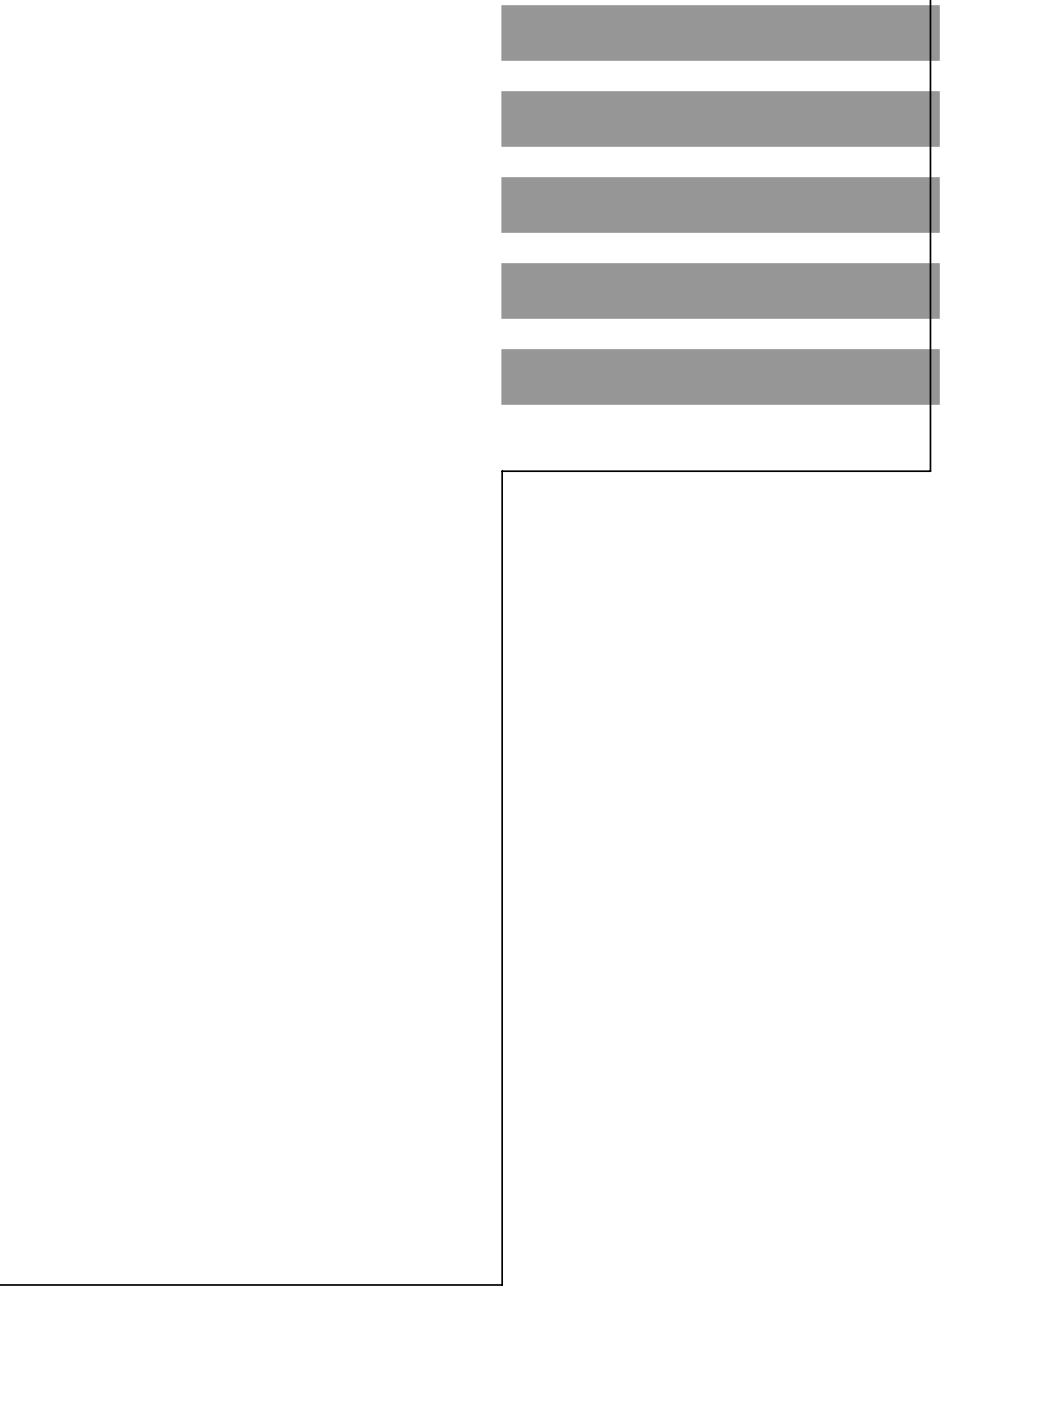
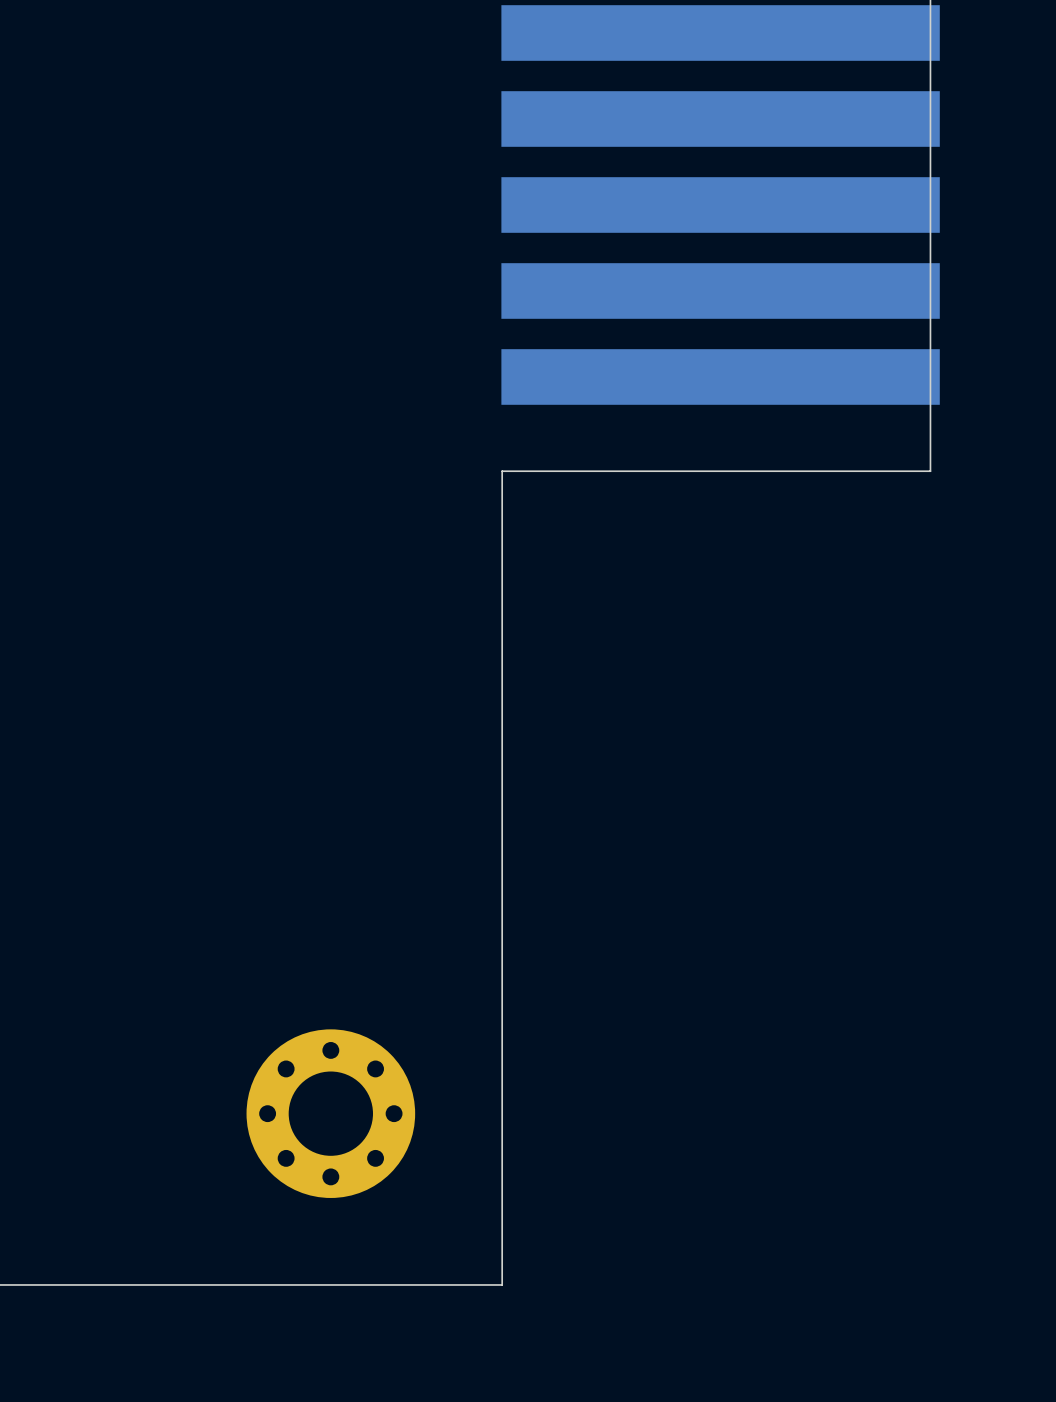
part: none -> (330, 1113)

